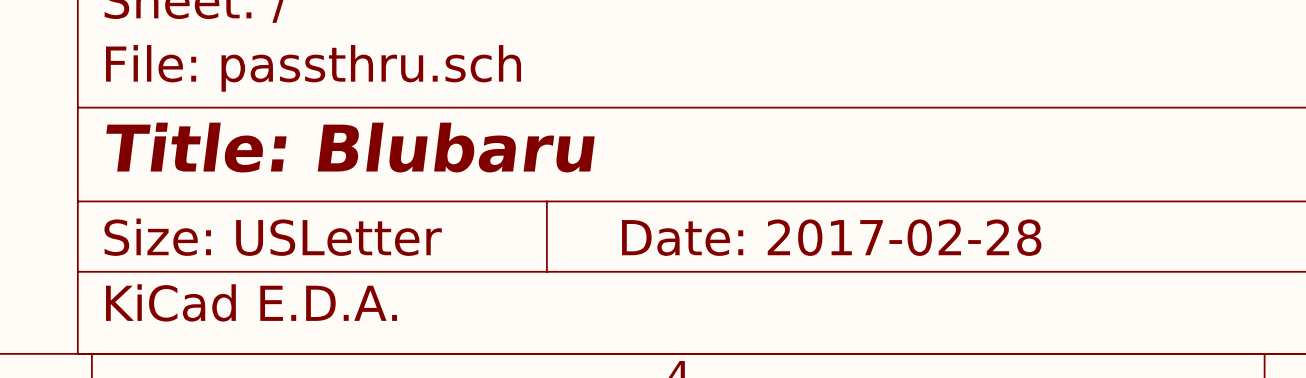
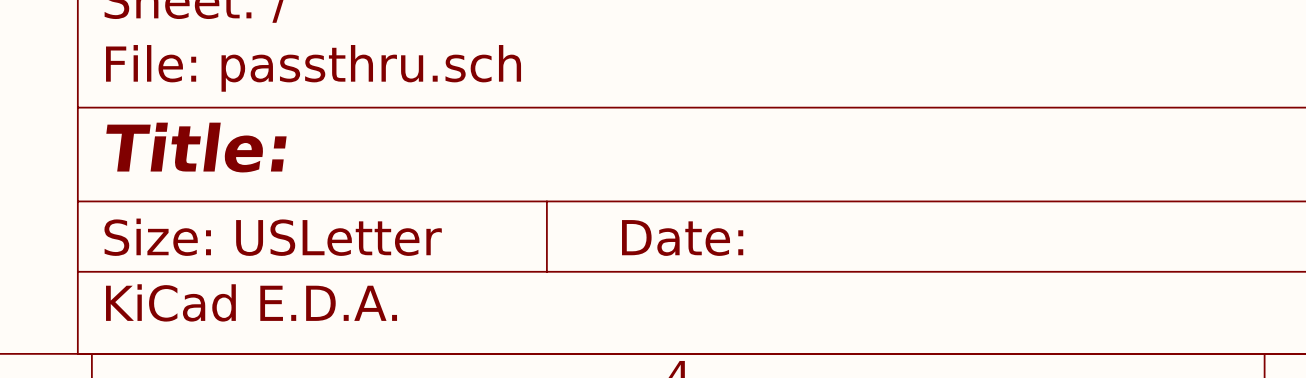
title block: Title: Blubaru (350, 147) -> Title: (196, 147)
title block: Date: 2017-02-28 (831, 237) -> Date: (682, 237)

